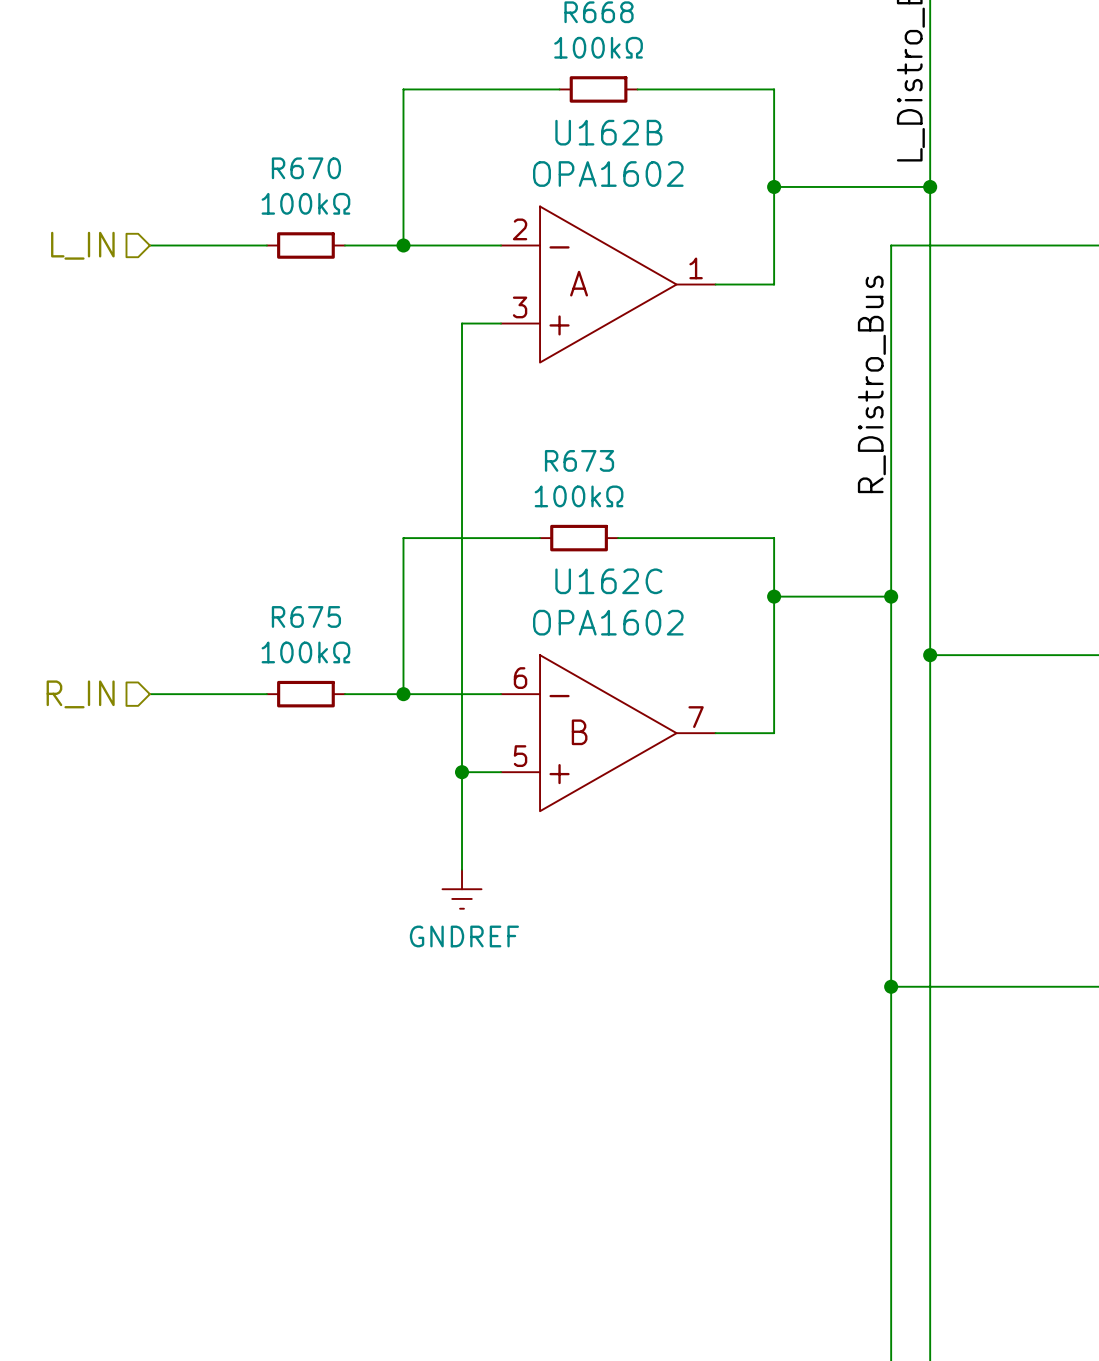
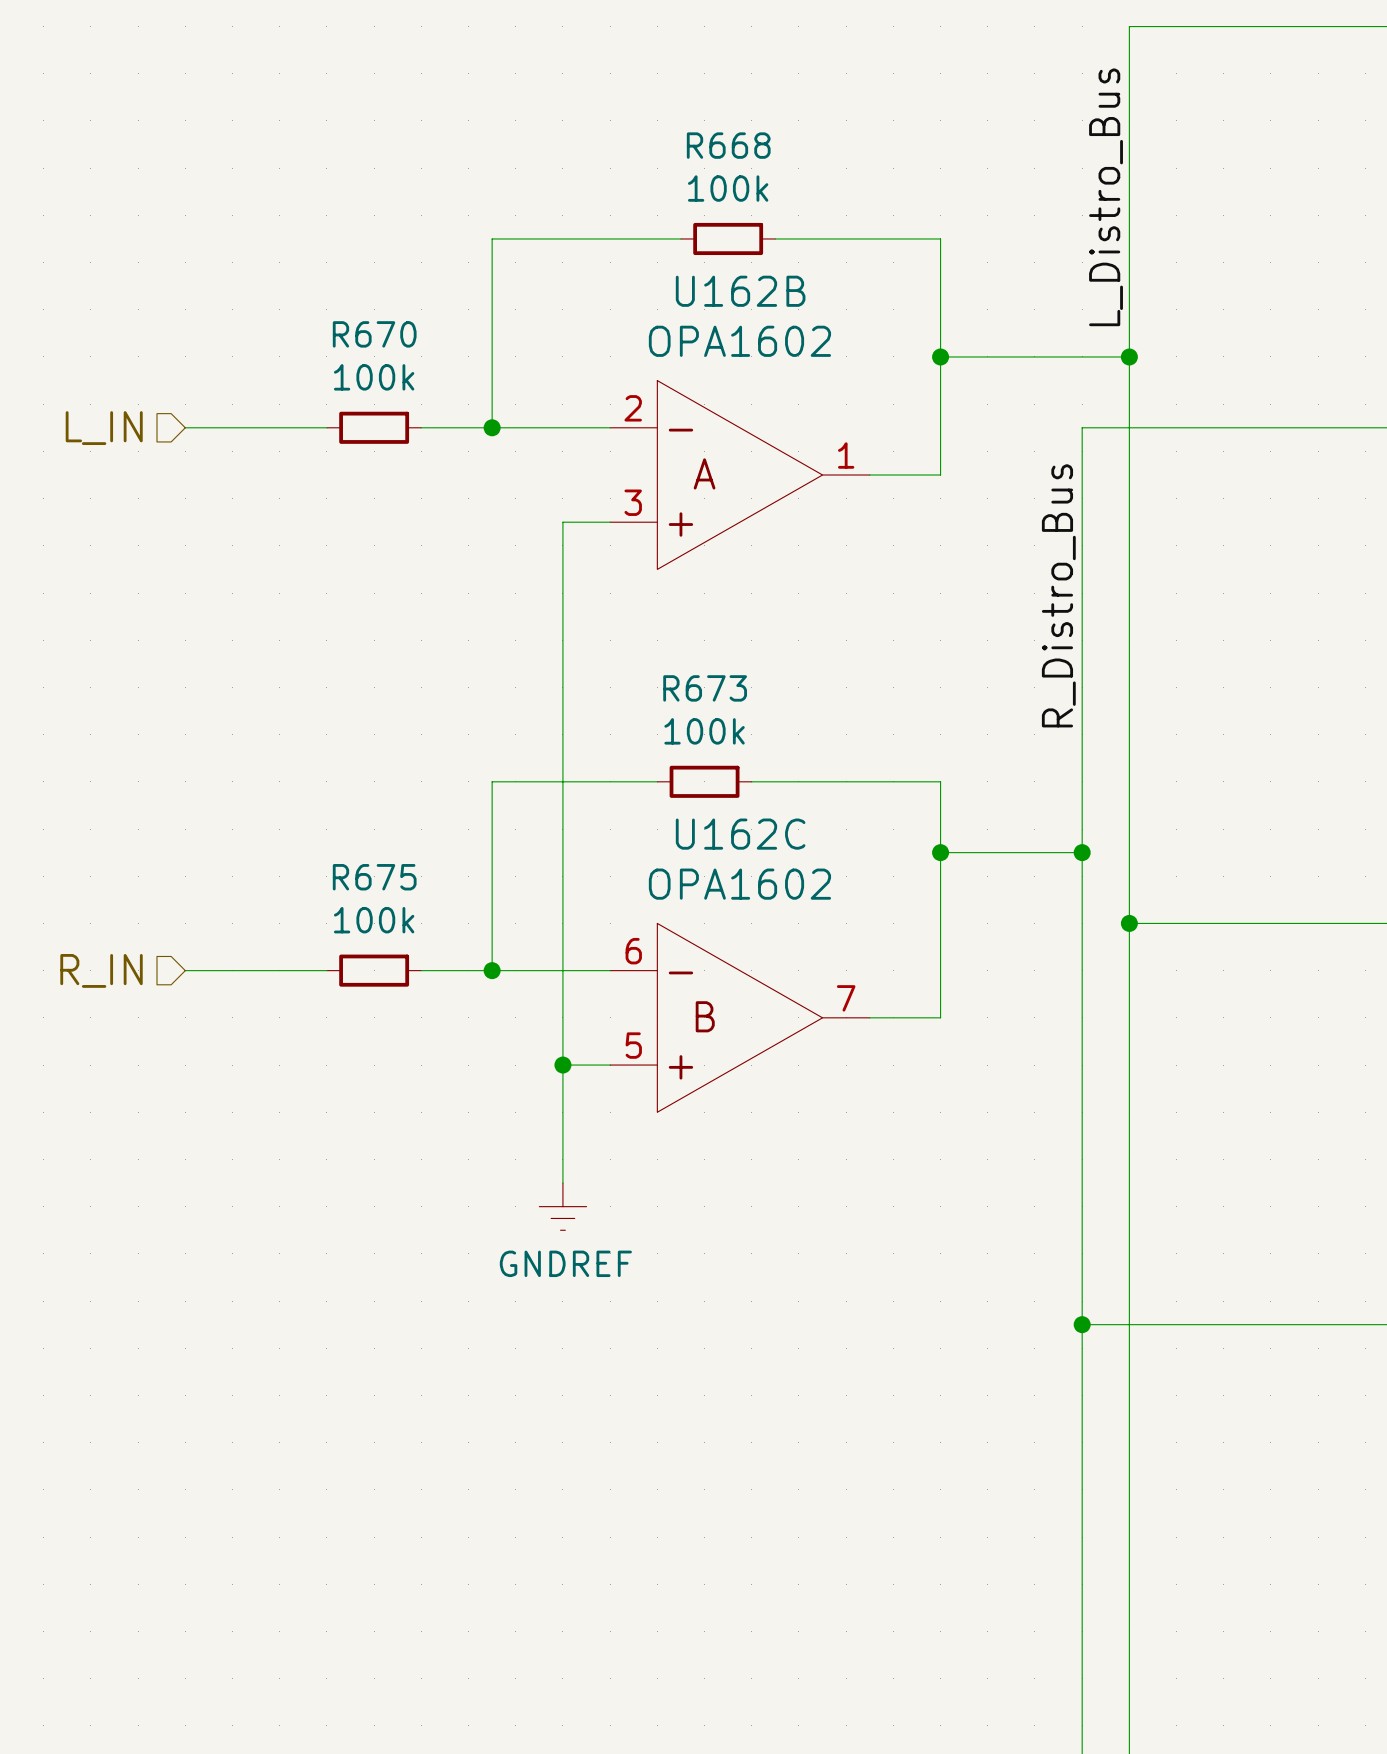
R668 value: 100kΩ (598, 47) -> 100k (728, 188)
R670 value: 100kΩ (305, 203) -> 100k (374, 377)
R673 value: 100kΩ (579, 496) -> 100k (704, 731)
R675 value: 100kΩ (305, 652) -> 100k (374, 920)

